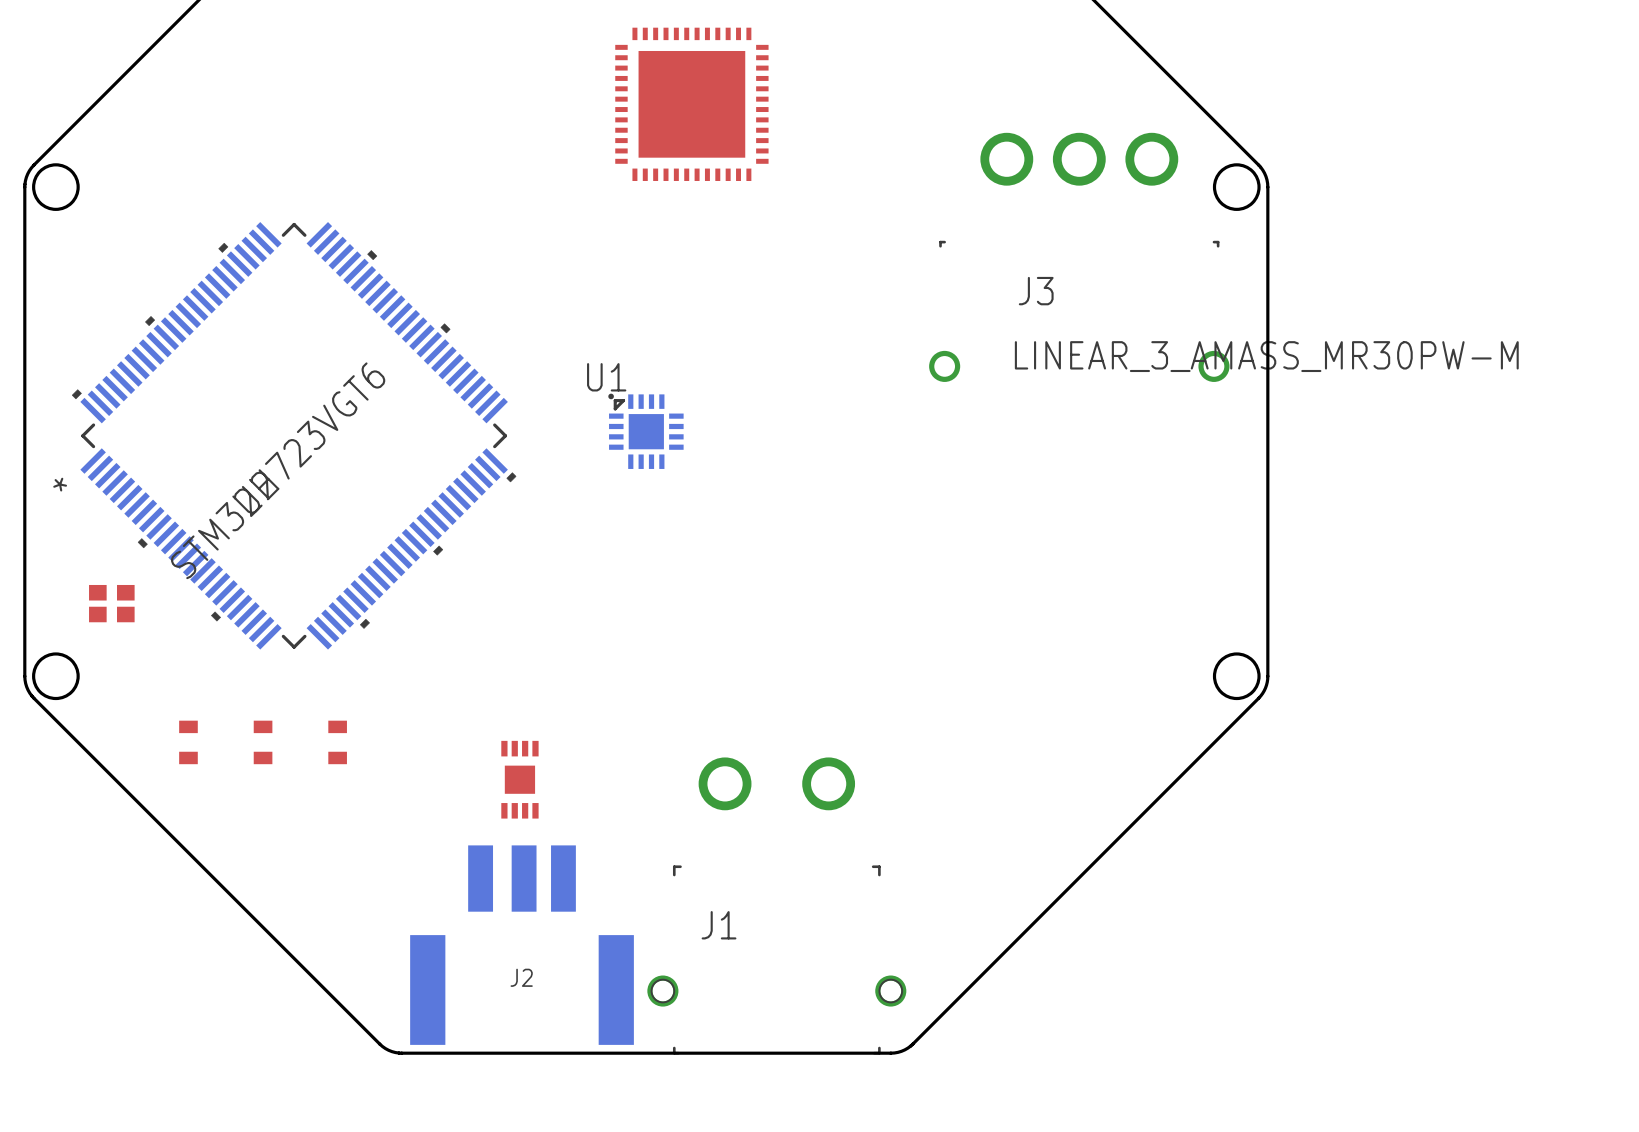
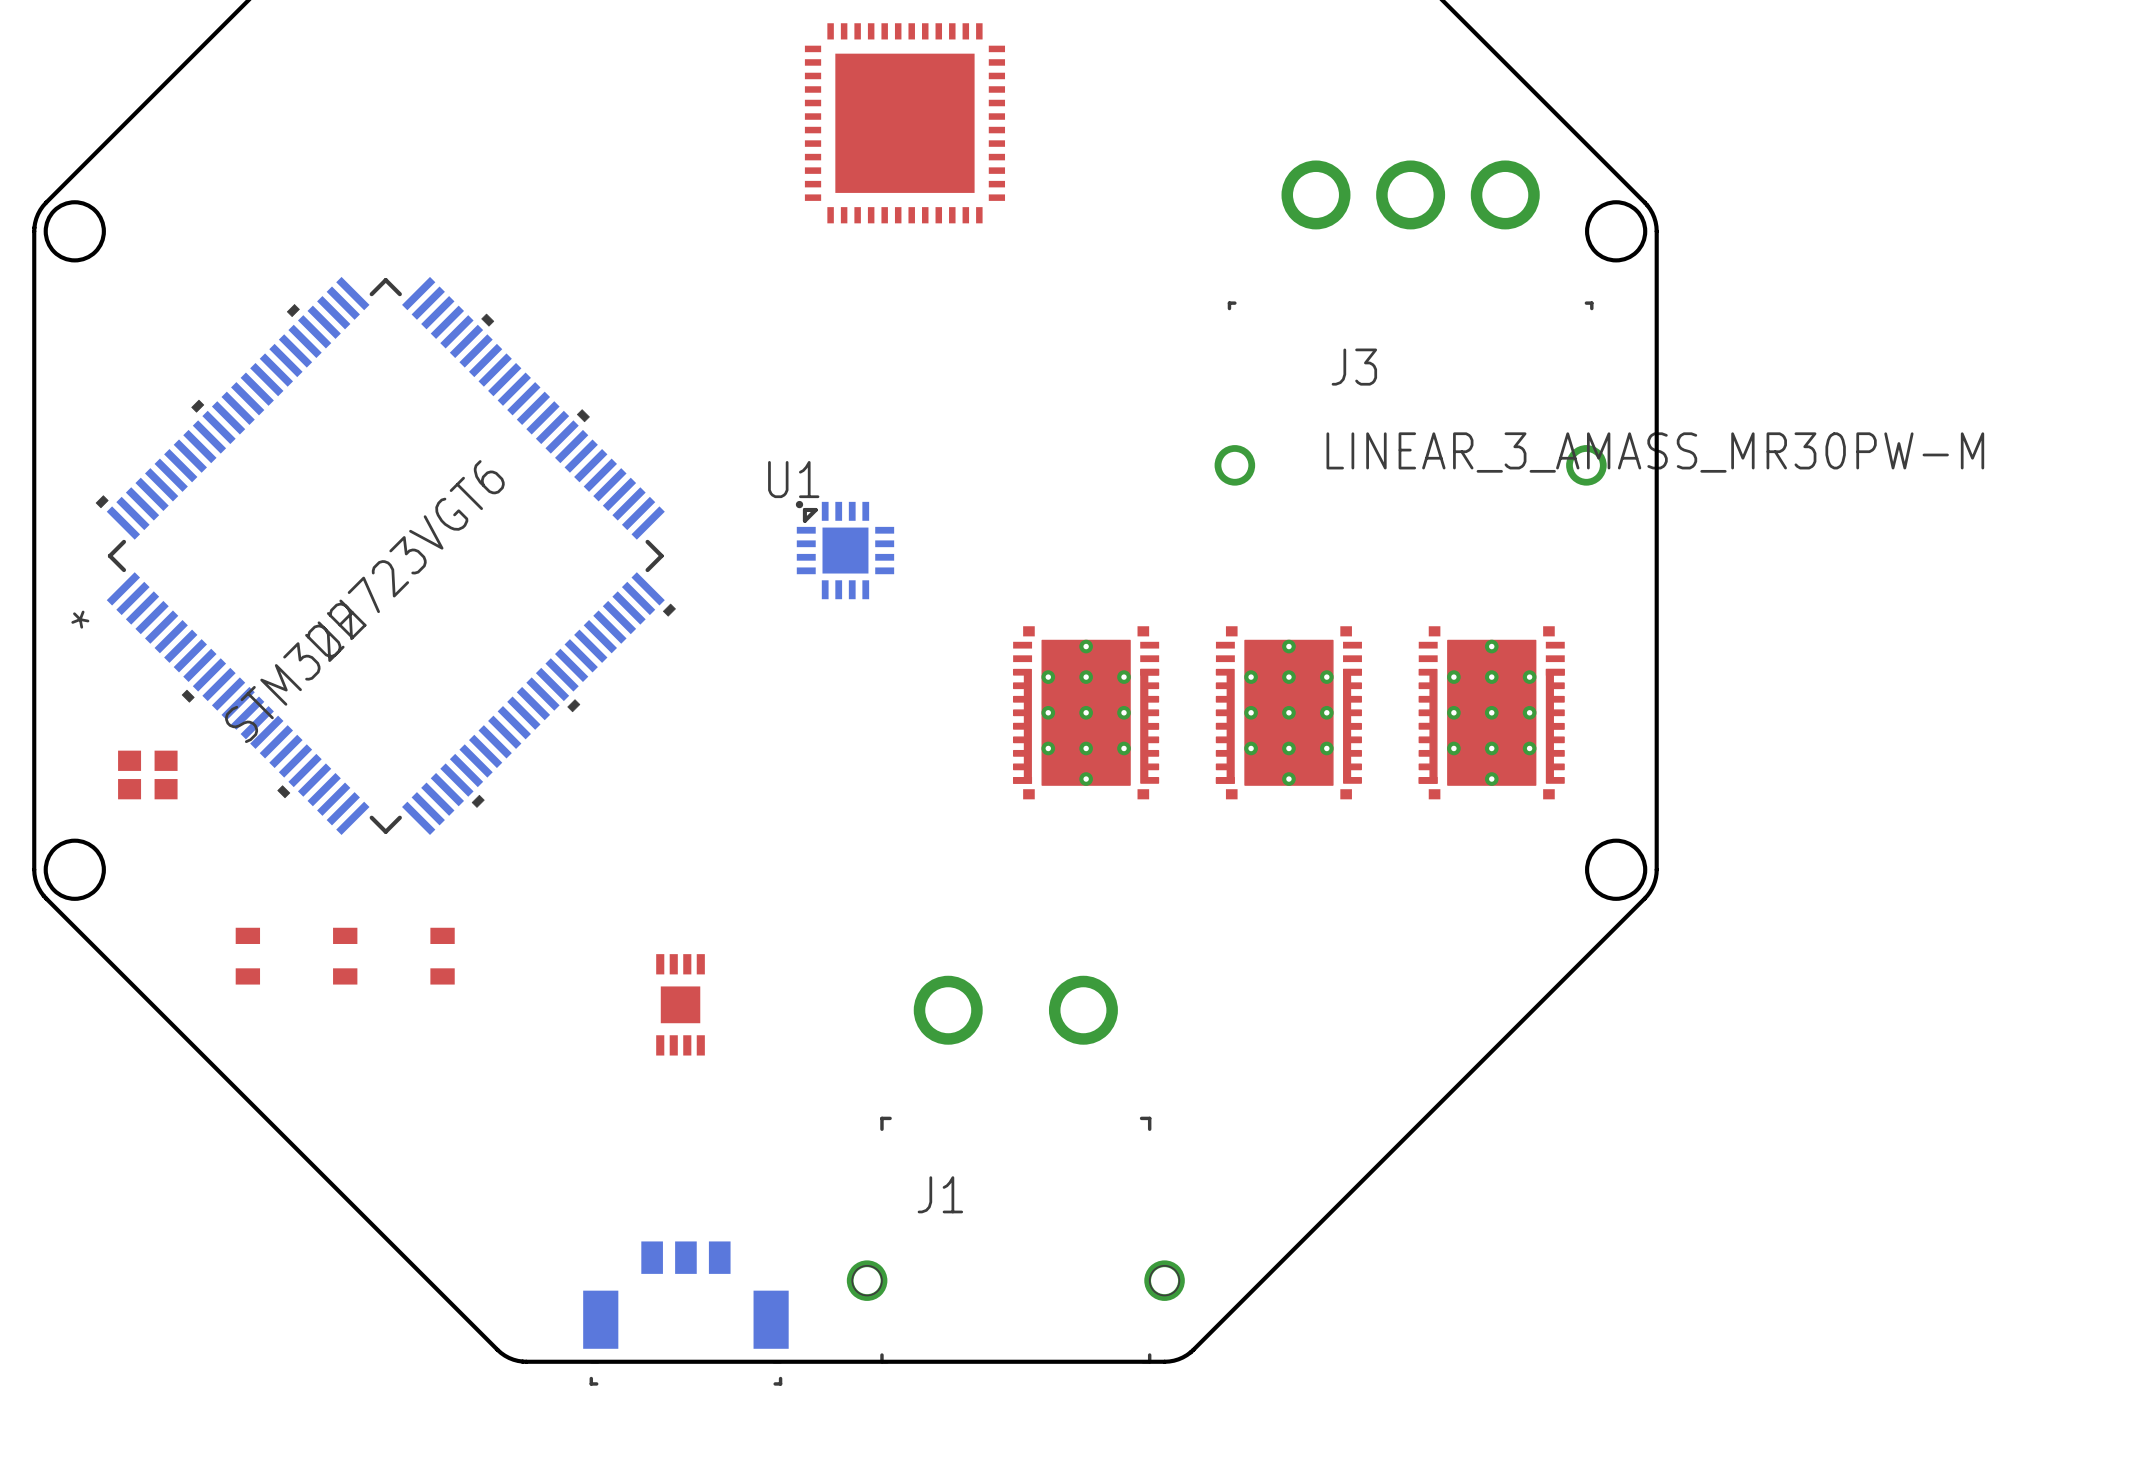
part: none -> (1086, 712)
part: none -> (1288, 712)
part: none -> (1491, 712)
J2: (522, 945) -> none
part: none -> (685, 1313)

